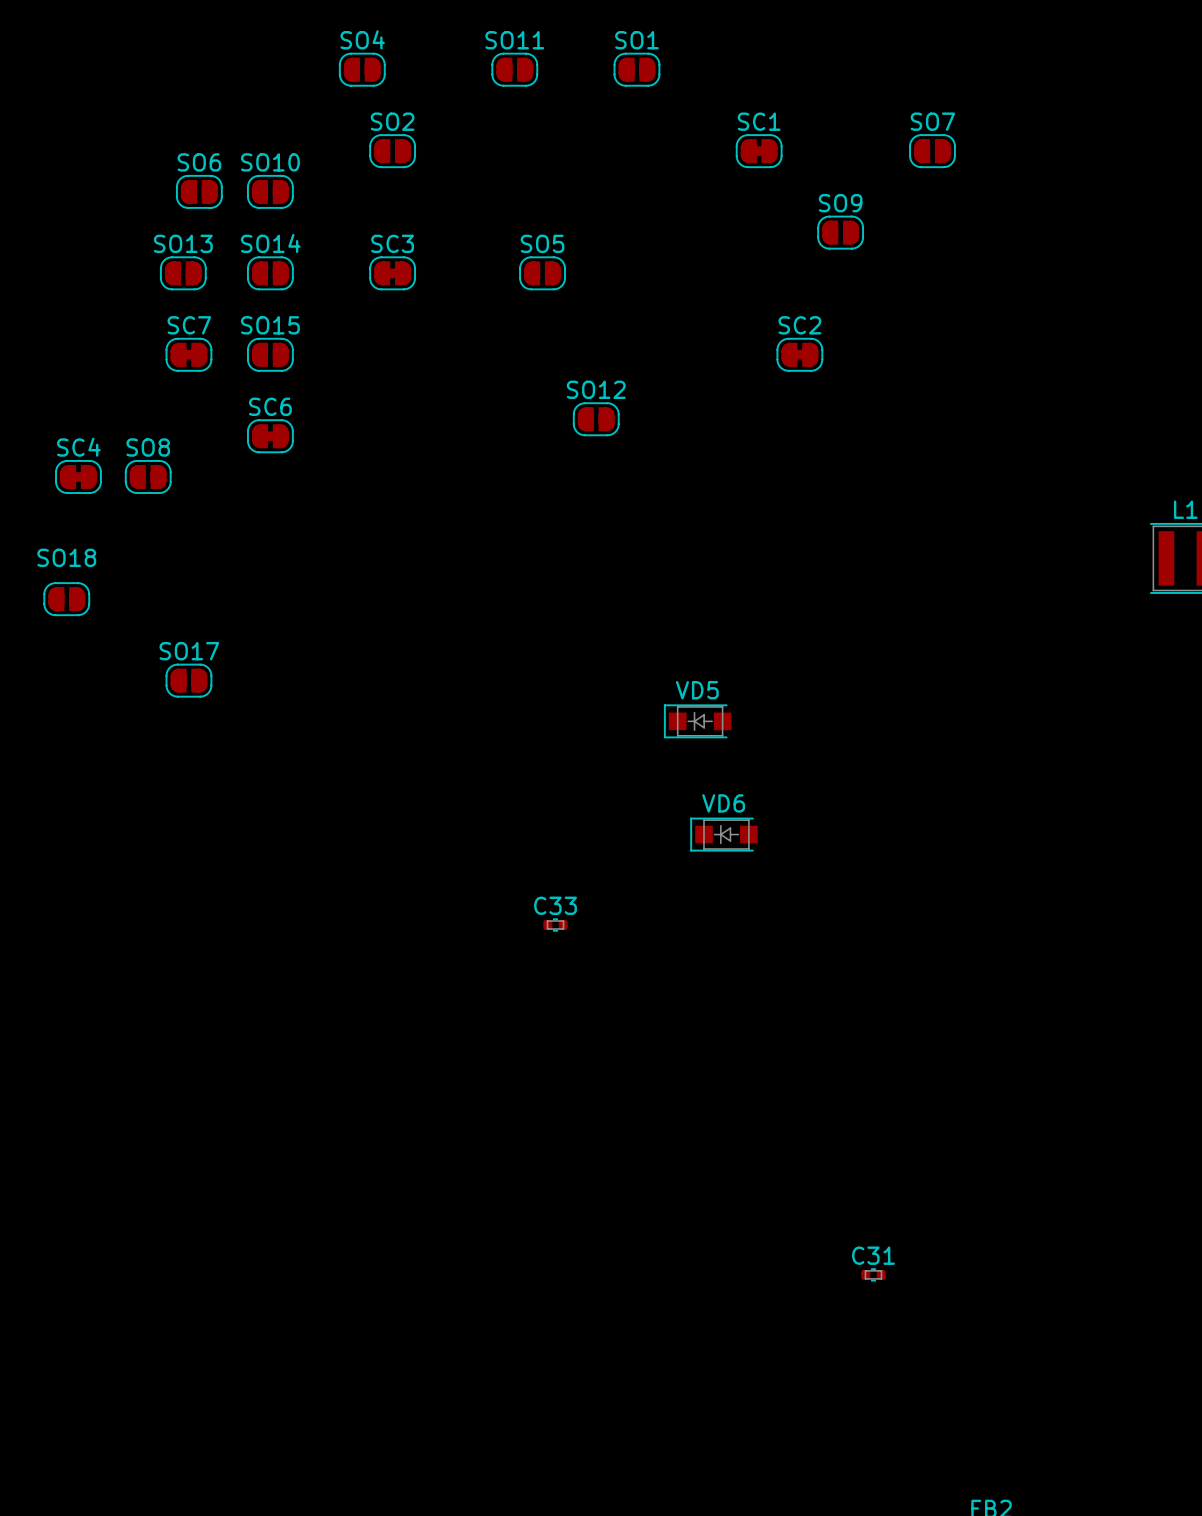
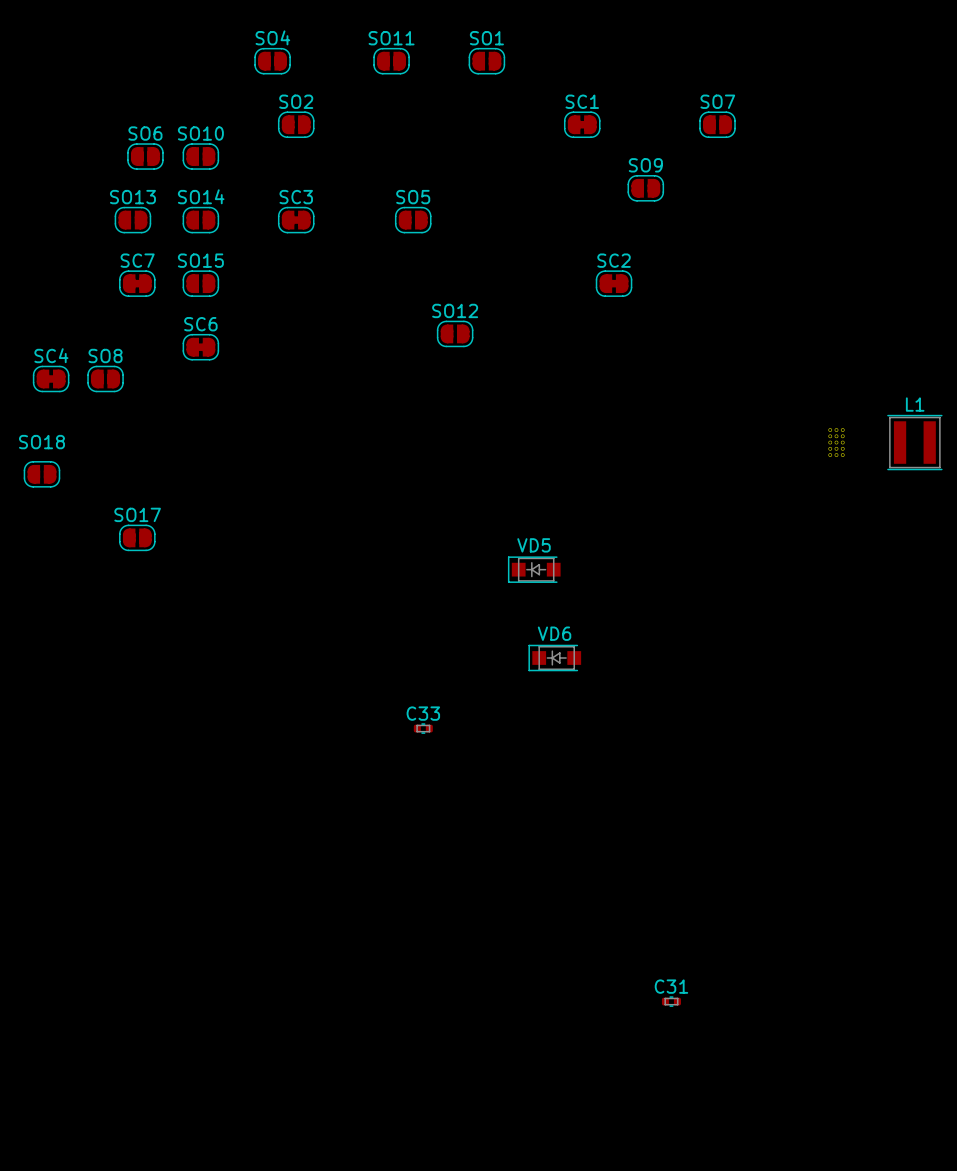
part: none -> (836, 442)

